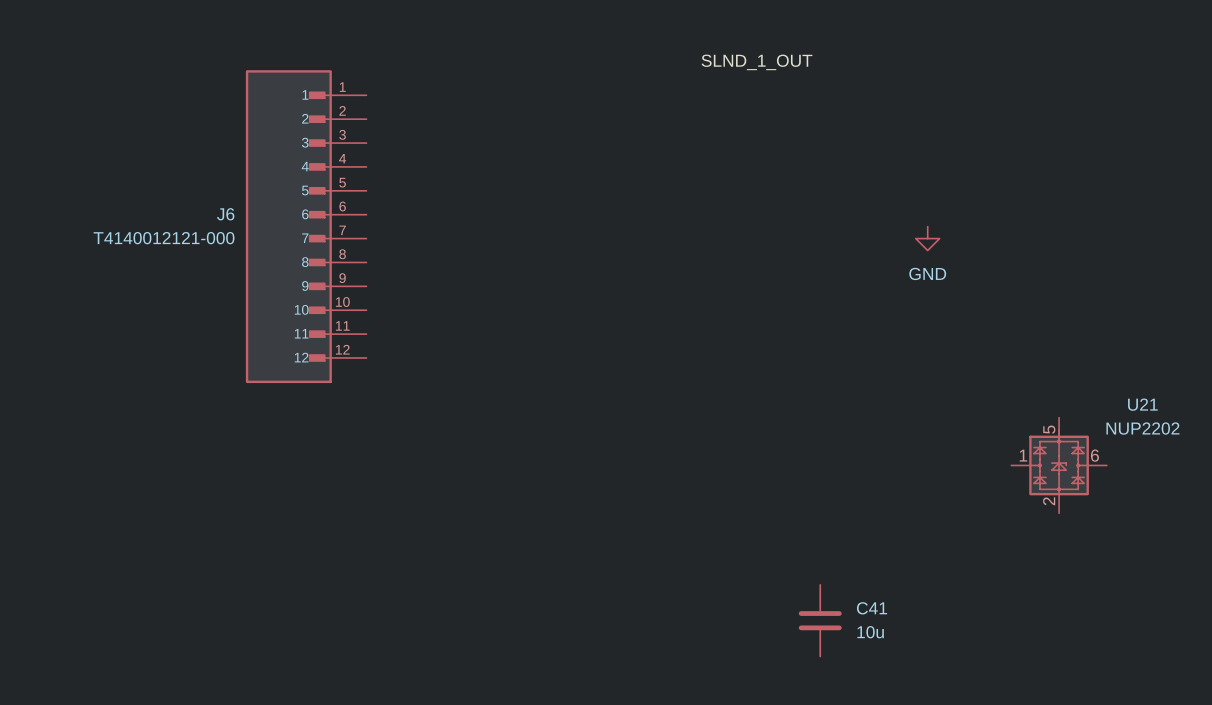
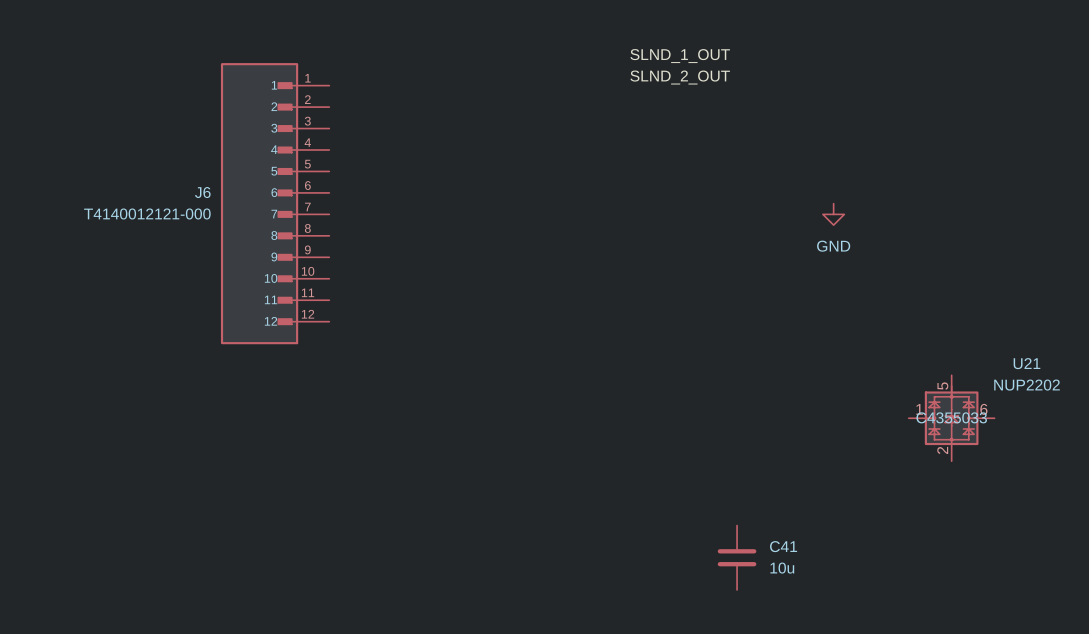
label: none -> SLND_2_OUT (680, 77)
U21 text: none -> C4355033 (951, 417)

